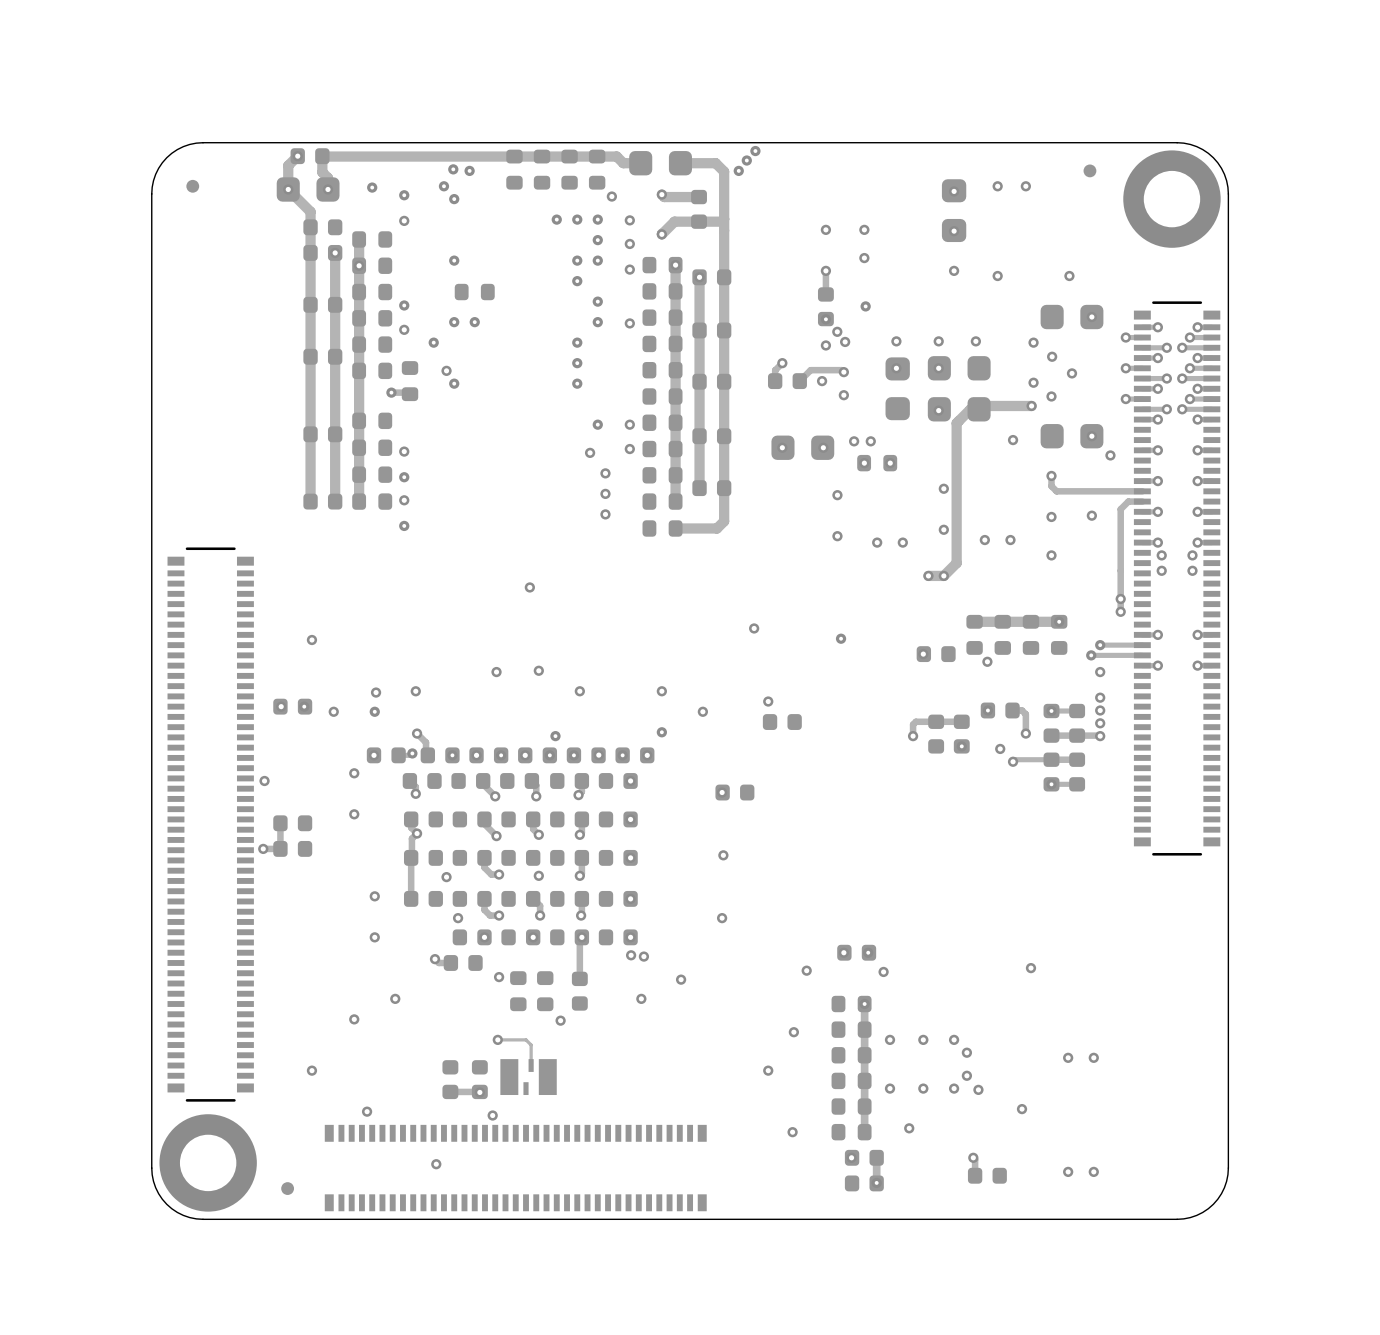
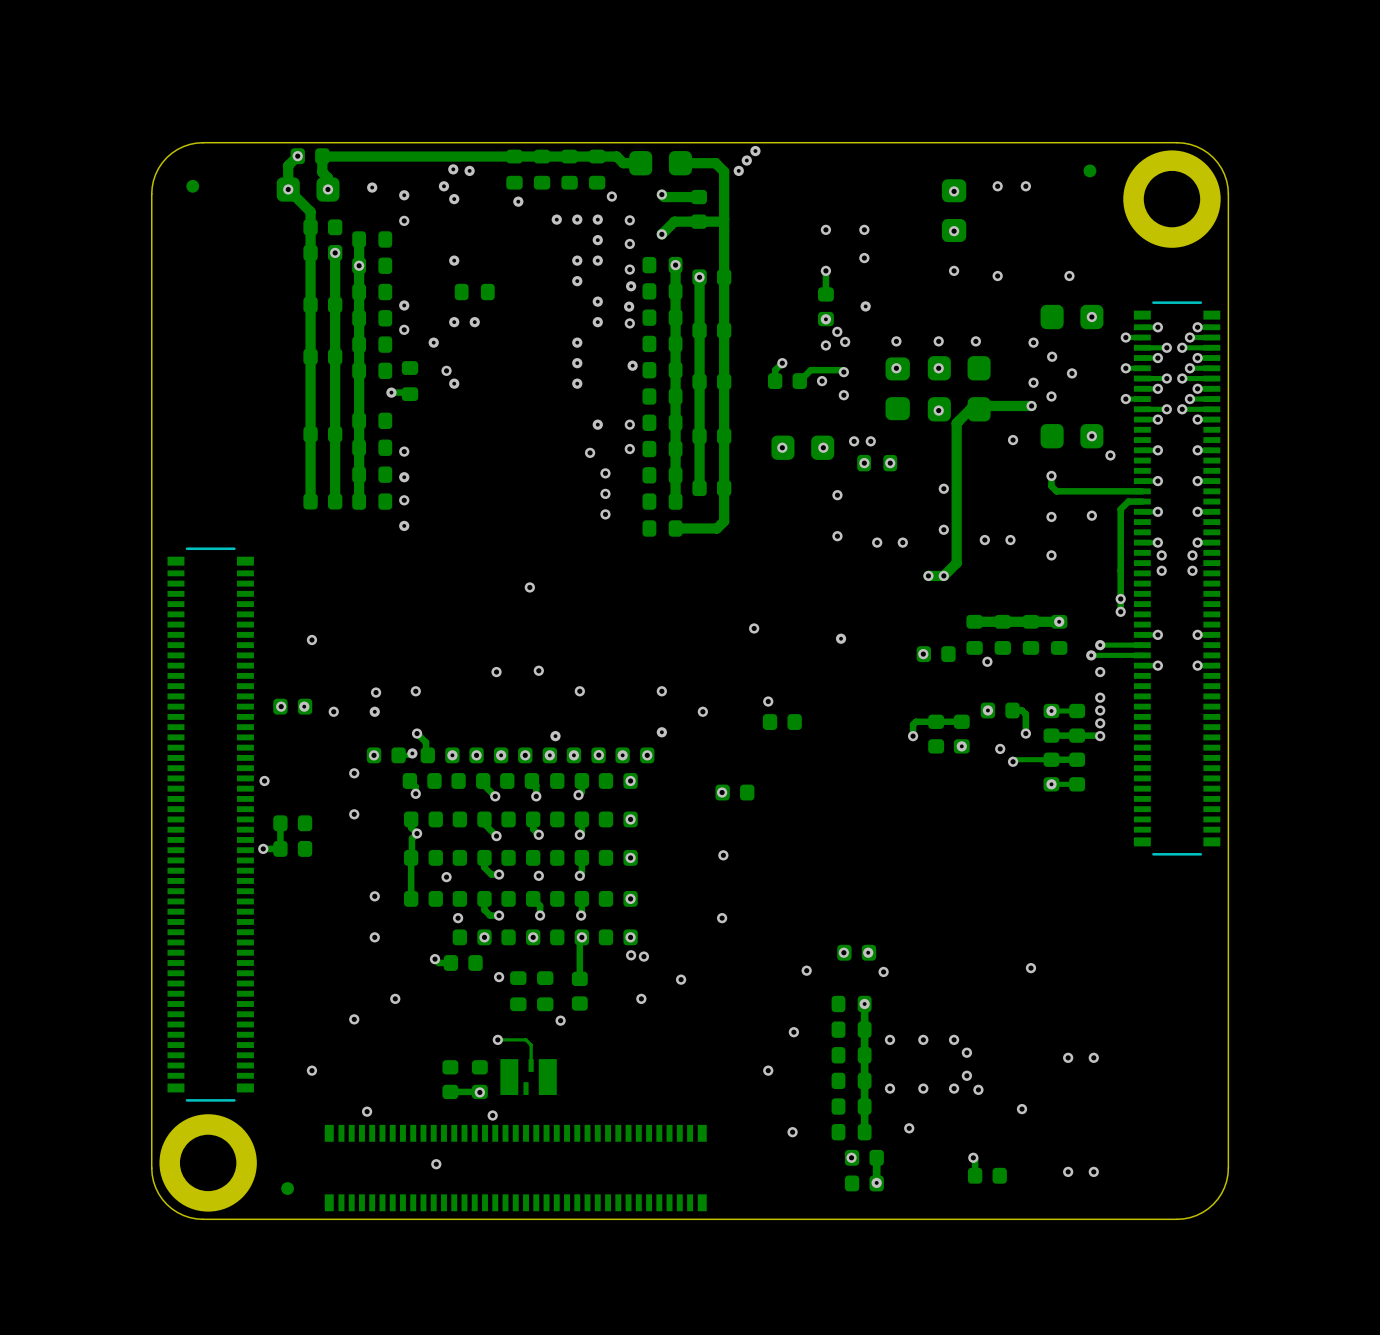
via: none -> (518, 201)
via: none -> (631, 286)
via: none -> (629, 306)
via: none -> (632, 365)

